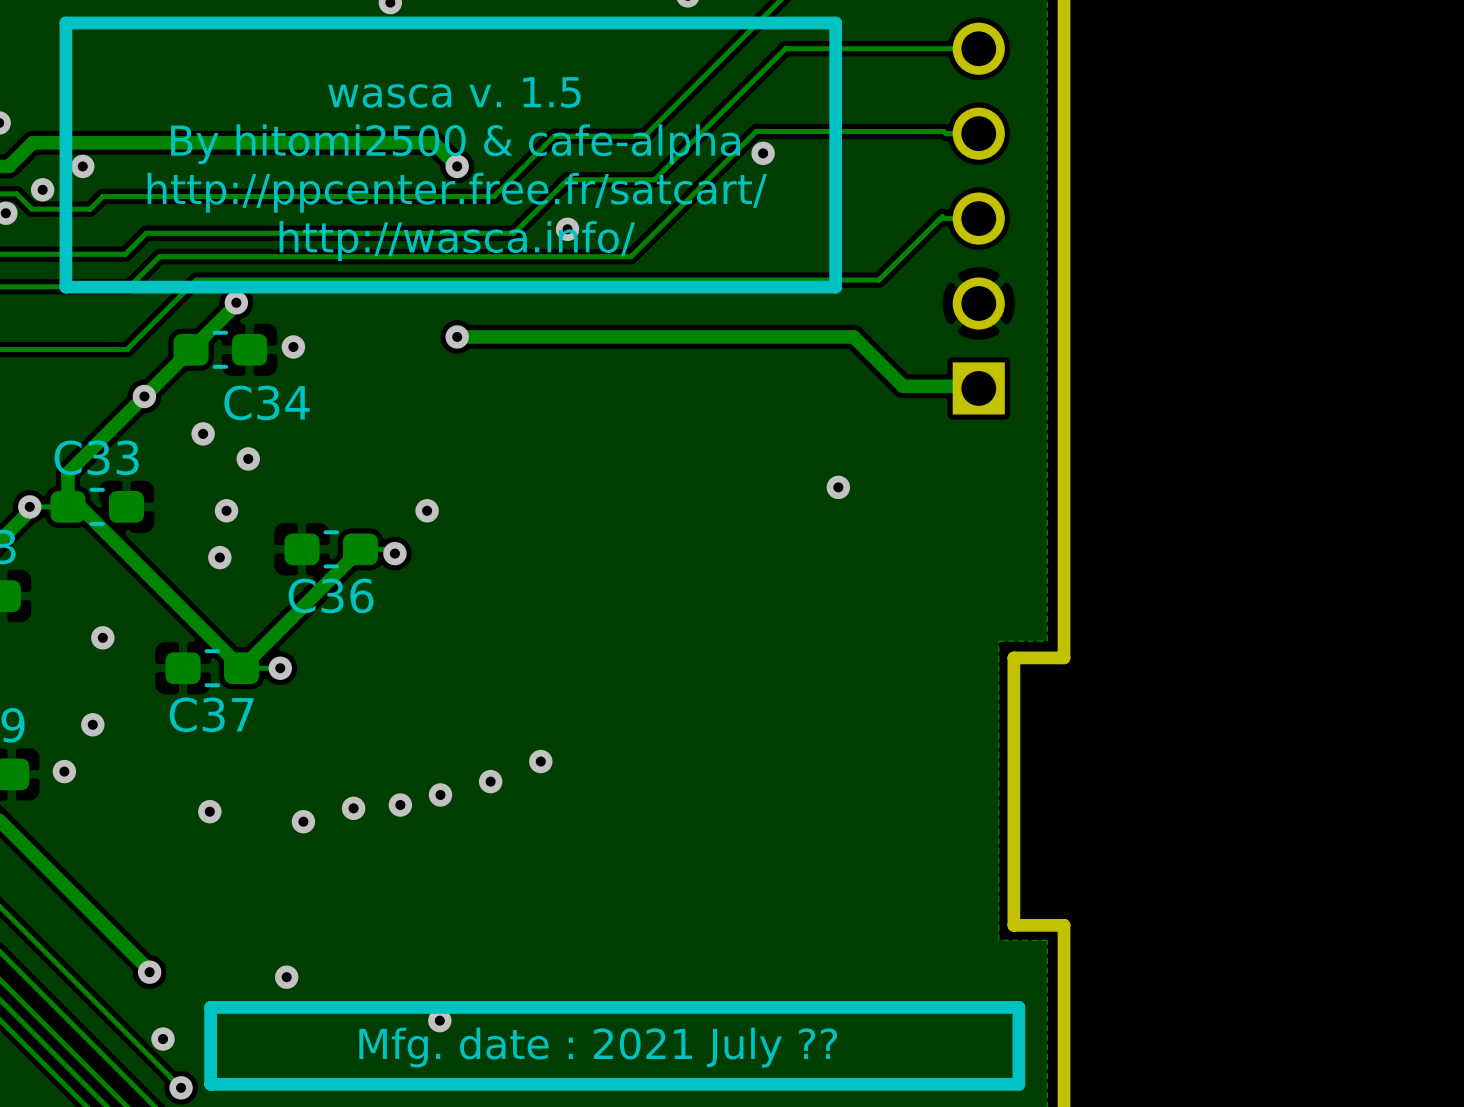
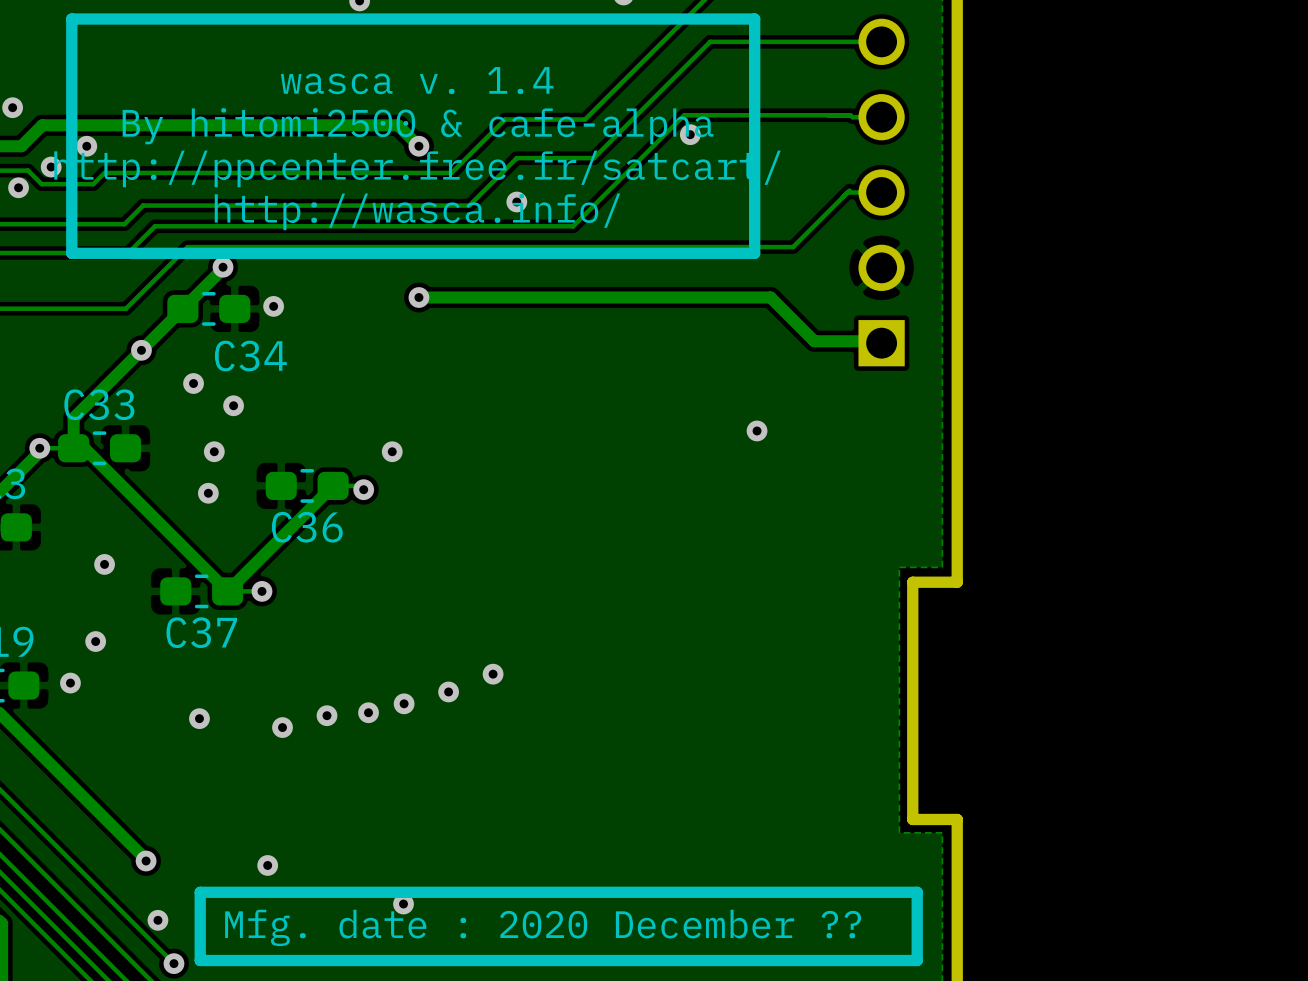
text: wasca v. 1.5 (454, 92) -> wasca v. 1.4 (417, 80)
text: Mfg. date : 2021 July ?? (598, 1047) -> Mfg. date : 2020 December ?? (543, 927)

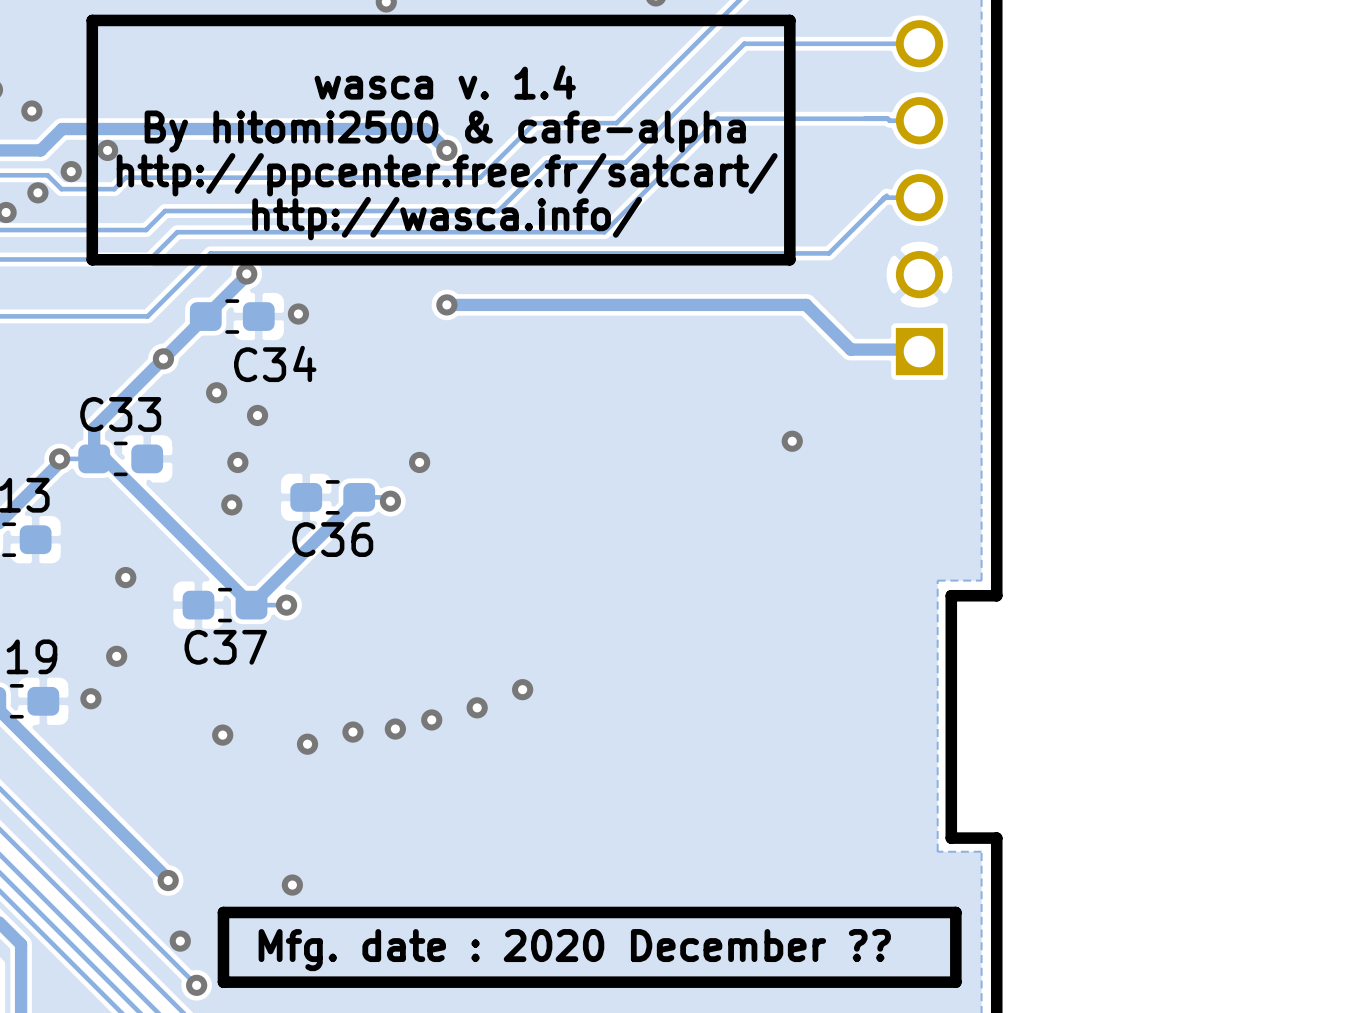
via: (690, 134) -> none
via: (516, 202) -> none
via: (403, 904) -> none

